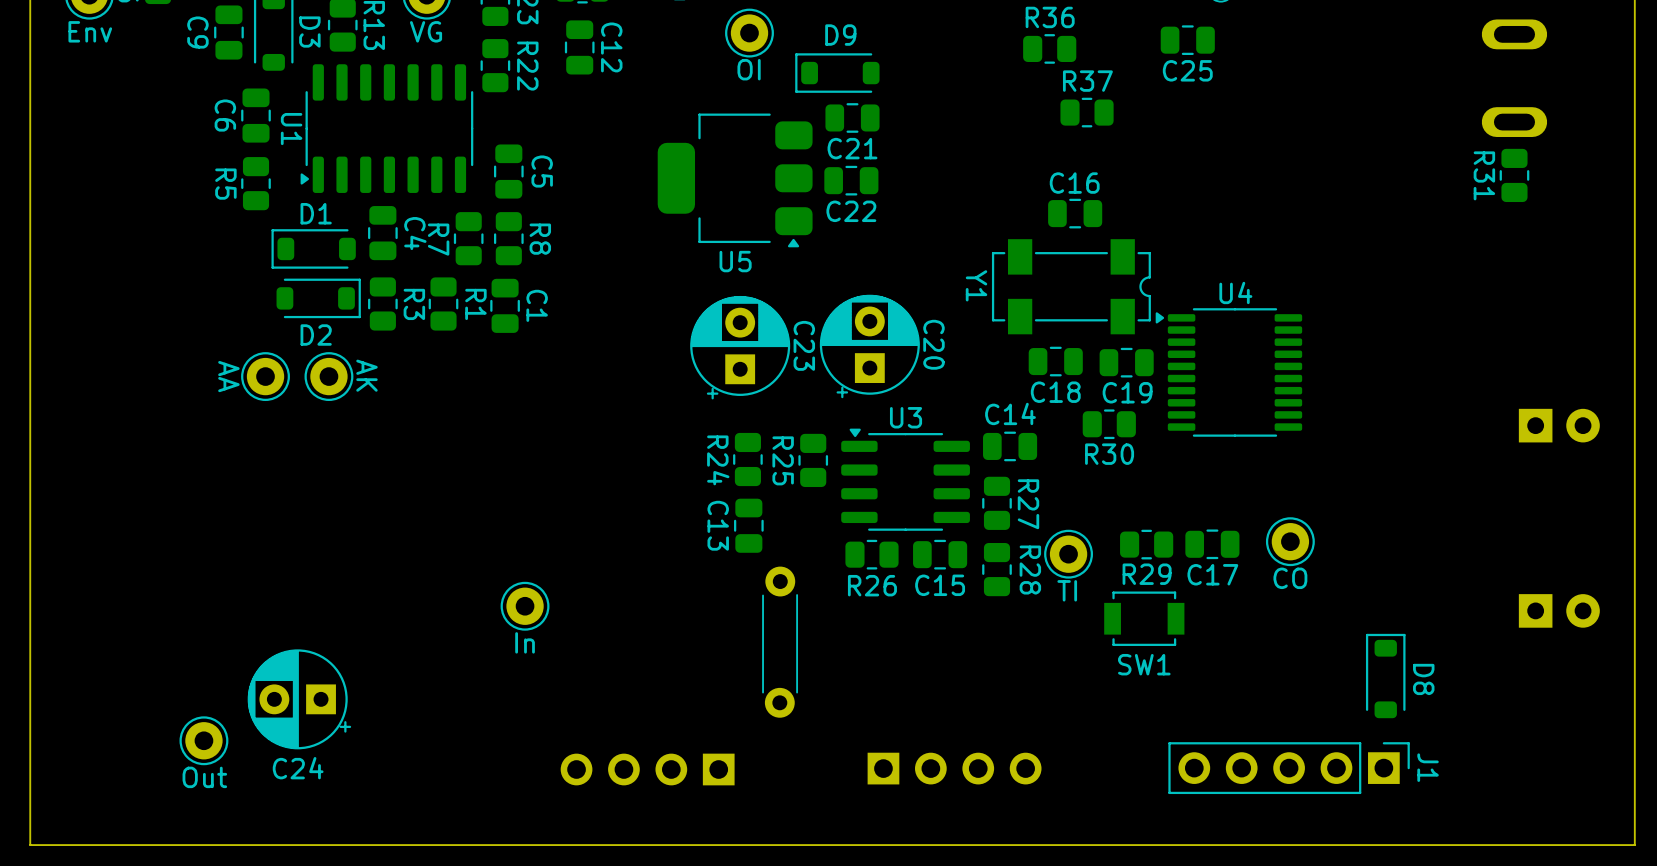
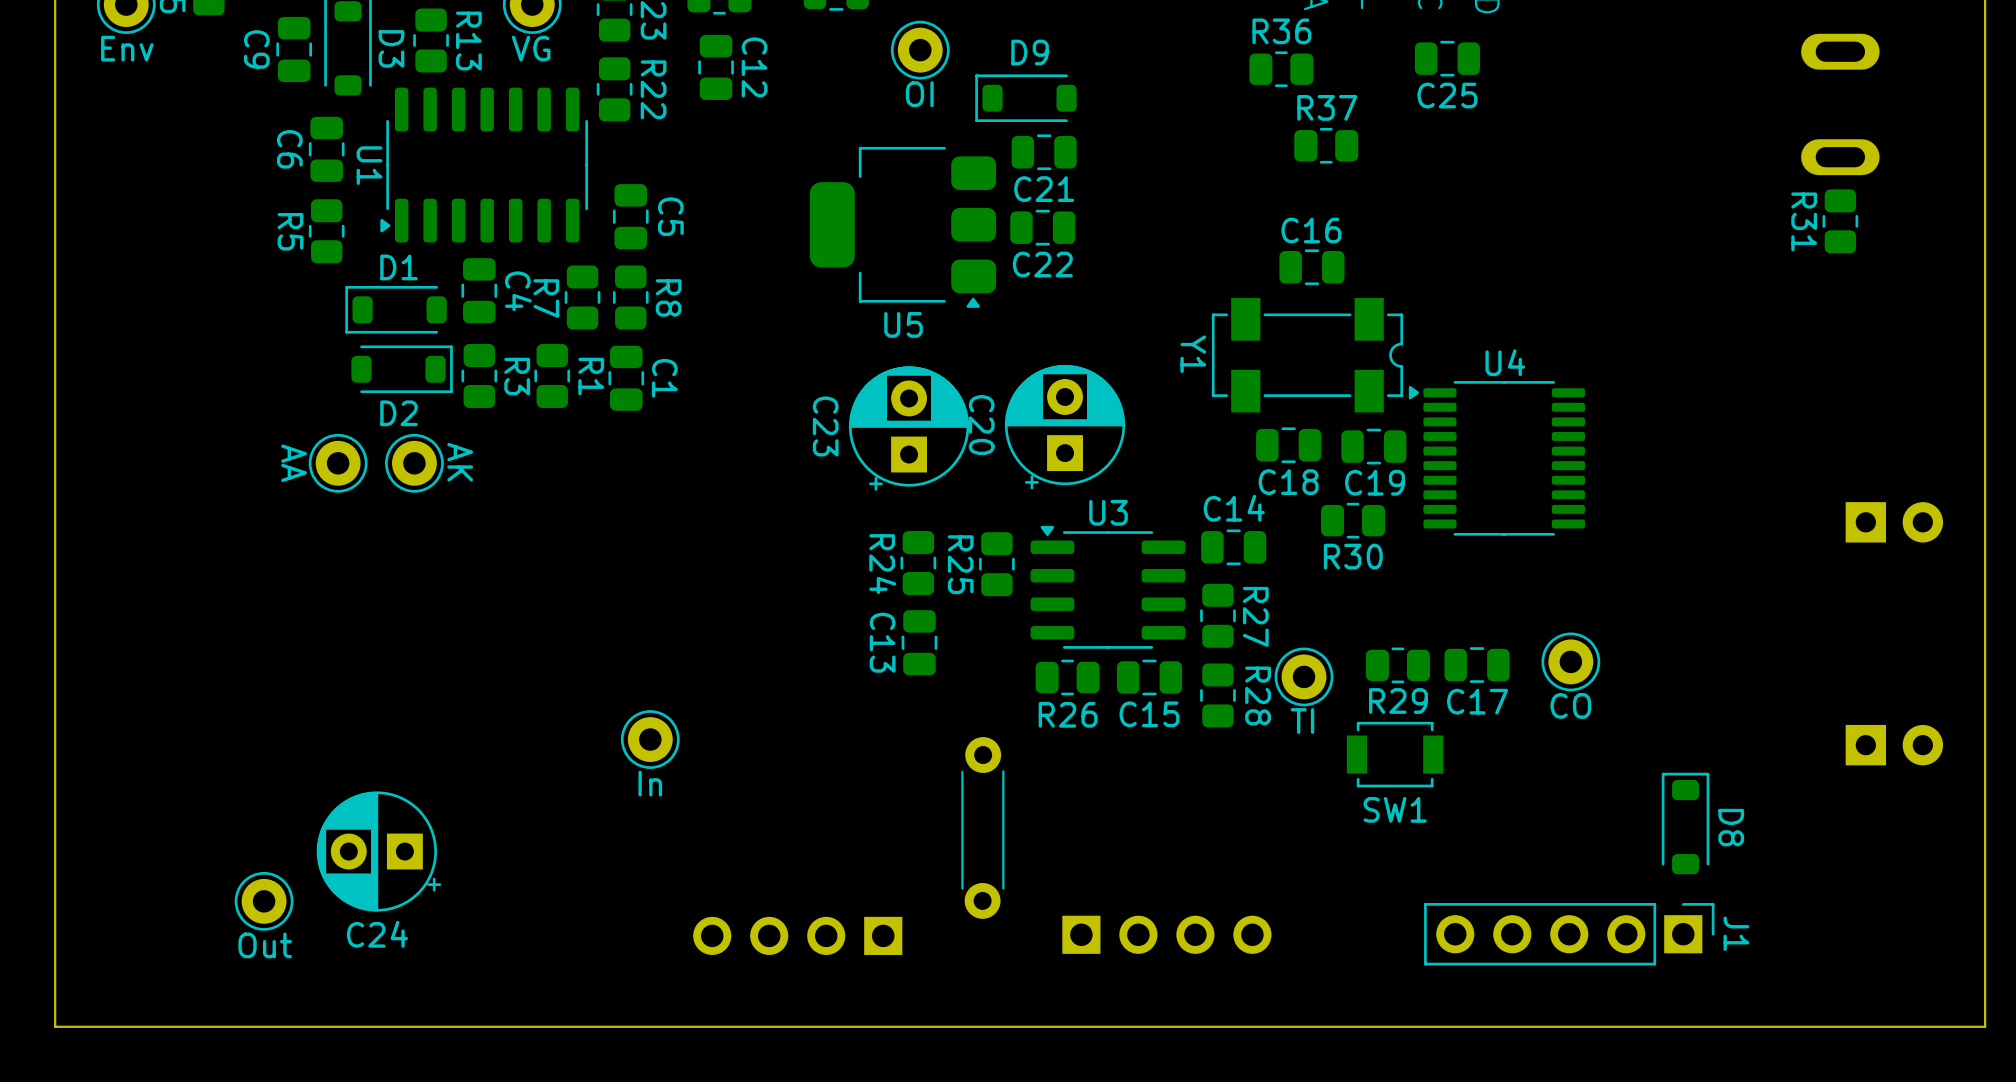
C20 name position: C20 (933, 344) -> C20 (981, 425)
C23 name position: C23 (804, 345) -> C23 (825, 426)
part position: (780, 642) -> (982, 827)

